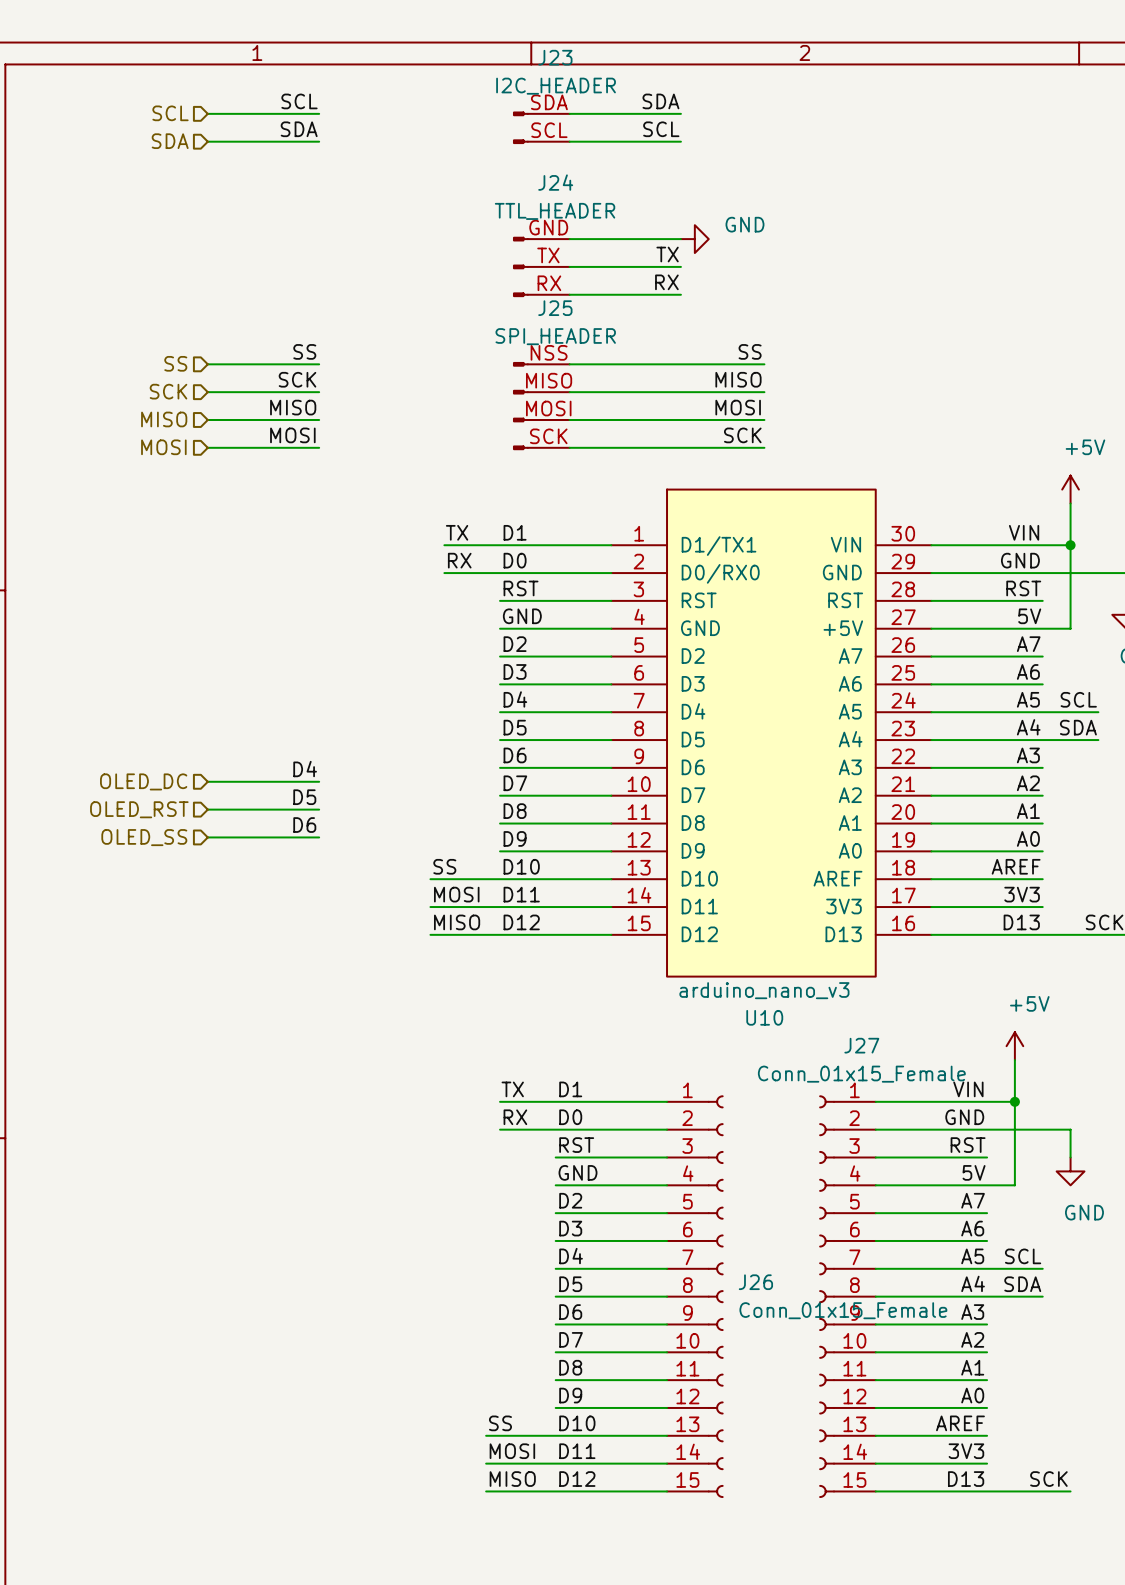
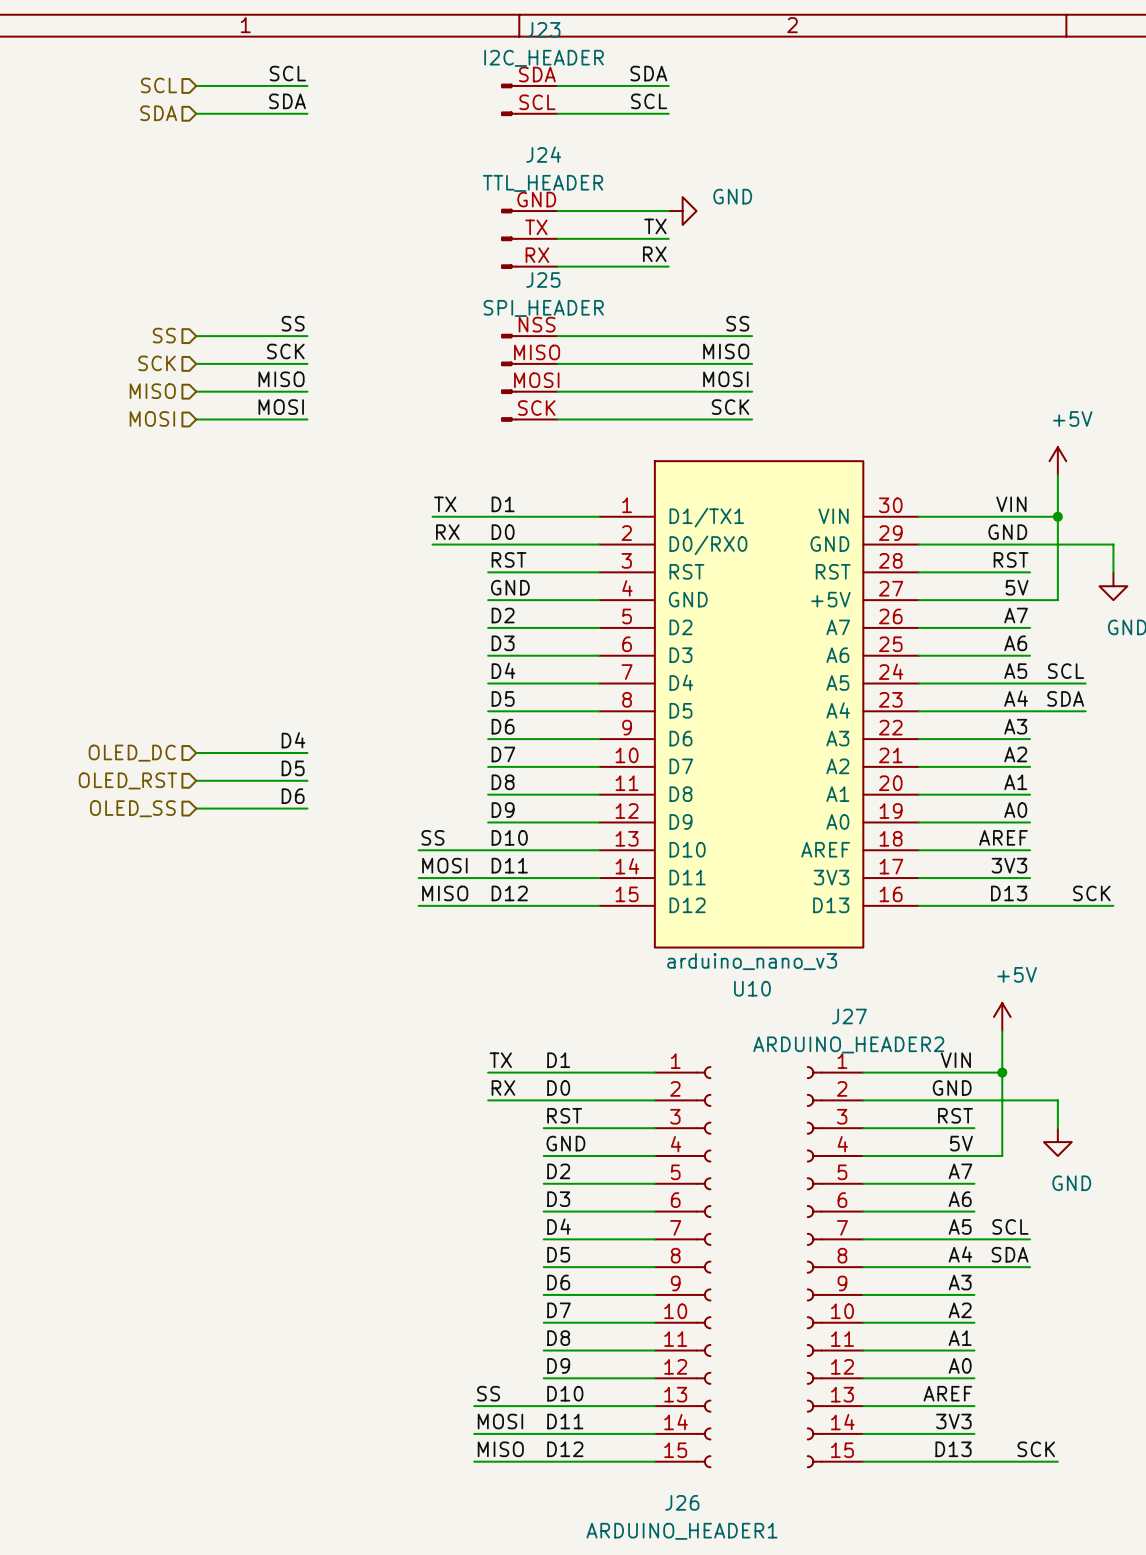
J27 value: Conn_01x15_Female (861, 1074) -> ARDUINO_HEADER2 (848, 1044)
J26 name position: J26 (755, 1282) -> J26 (682, 1502)
J26 value: Conn_01x15_Female (843, 1310) -> ARDUINO_HEADER1 (681, 1531)

